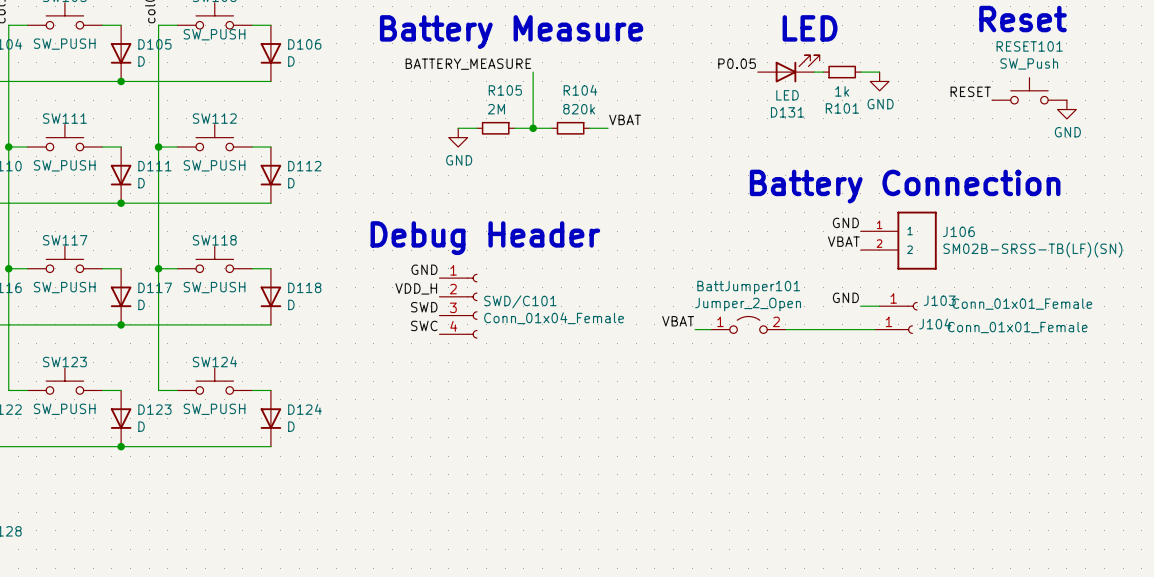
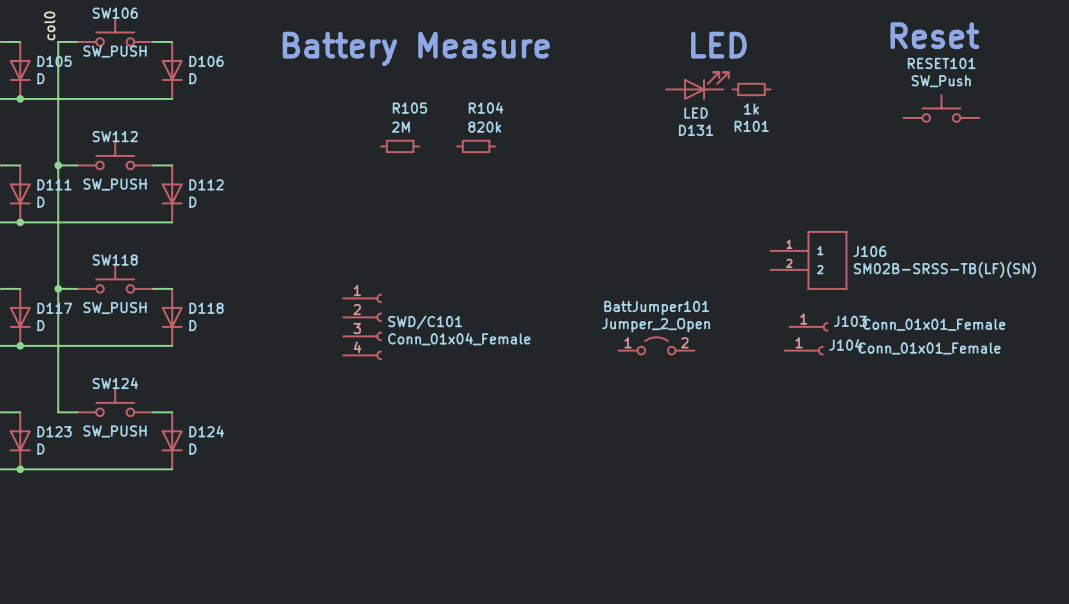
label: P0.05 (737, 63) -> none
label: BATTERY_MEASURE (468, 64) -> none
wire: (533, 72) (533, 128) -> none
wire: (814, 72) (823, 72) -> none
wire: (860, 72) (879, 72) -> none
power symbol: GND (879, 81) -> none
label: RESET (970, 91) -> none
power symbol: GND (1066, 109) -> none
label: VBAT (625, 119) -> none
wire: (458, 128) (476, 128) -> none
wire: (514, 128) (551, 128) -> none
junction: (533, 128) -> none
wire: (589, 128) (608, 128) -> none
power symbol: GND (458, 137) -> none
text: Battery Connection (905, 186) -> none
label: GND (845, 222) -> none
text: Debug Header (485, 238) -> none
label: VBAT (843, 241) -> none
label: GND (424, 269) -> none
label: VDD_H (416, 288) -> none
label: GND (845, 297) -> none
wire: (860, 306) (879, 306) -> none
label: SWD (424, 307) -> none
label: VBAT (678, 321) -> none
label: SWC (424, 325) -> none
wire: (695, 329) (711, 329) -> none
wire: (785, 329) (874, 329) -> none

